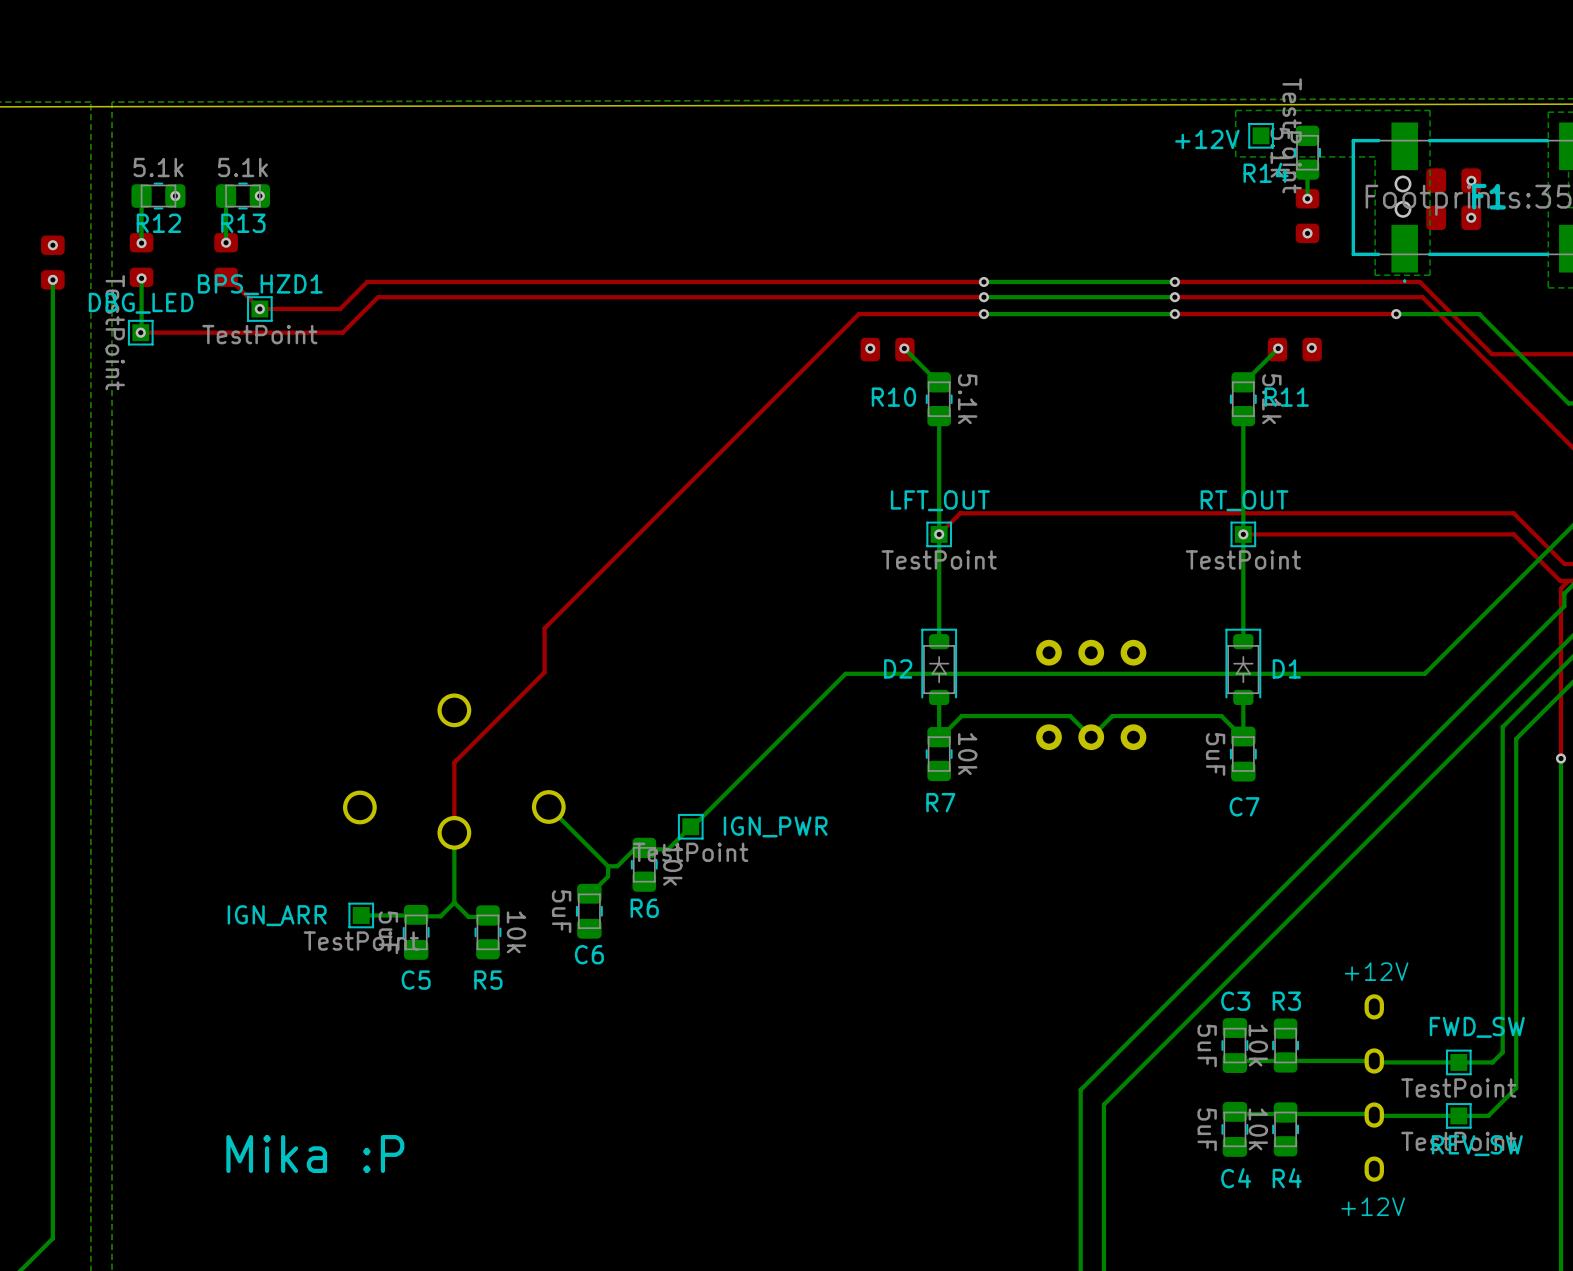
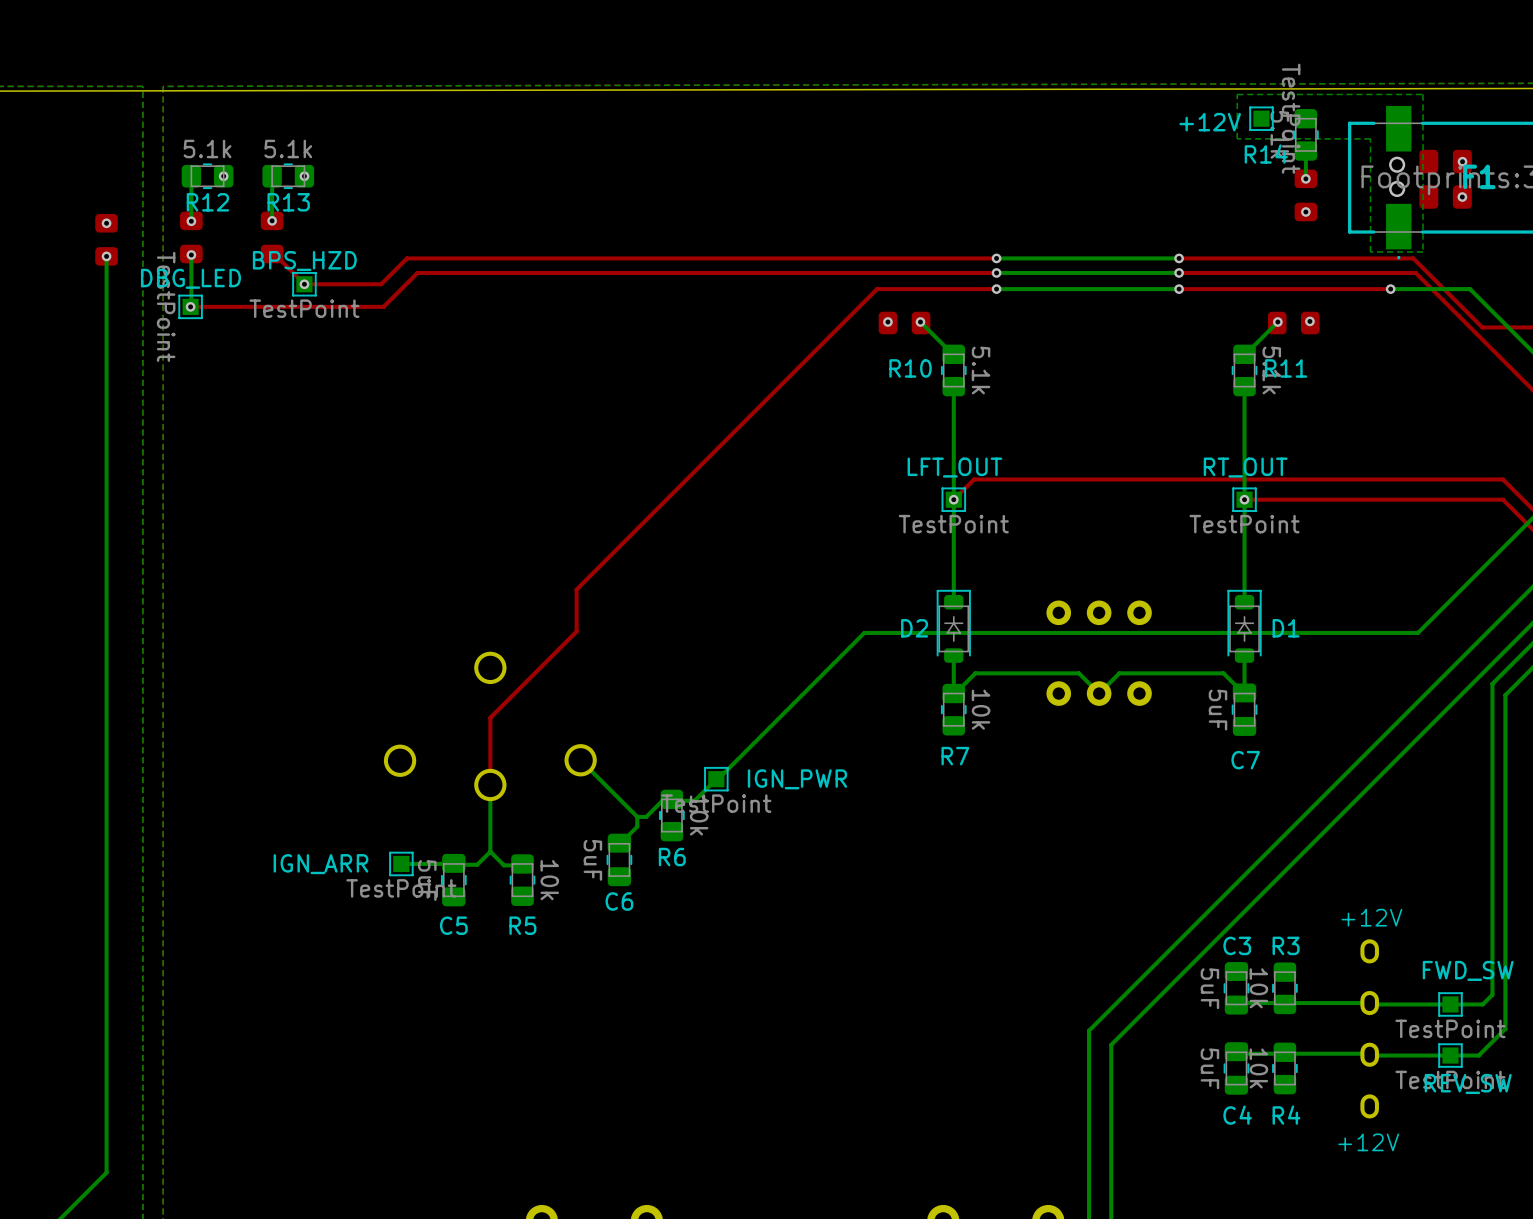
BPS_HZD1 name: BPS_HZD1 (260, 284) -> BPS_HZD (304, 261)
text: Mika :P (315, 1153) -> none

